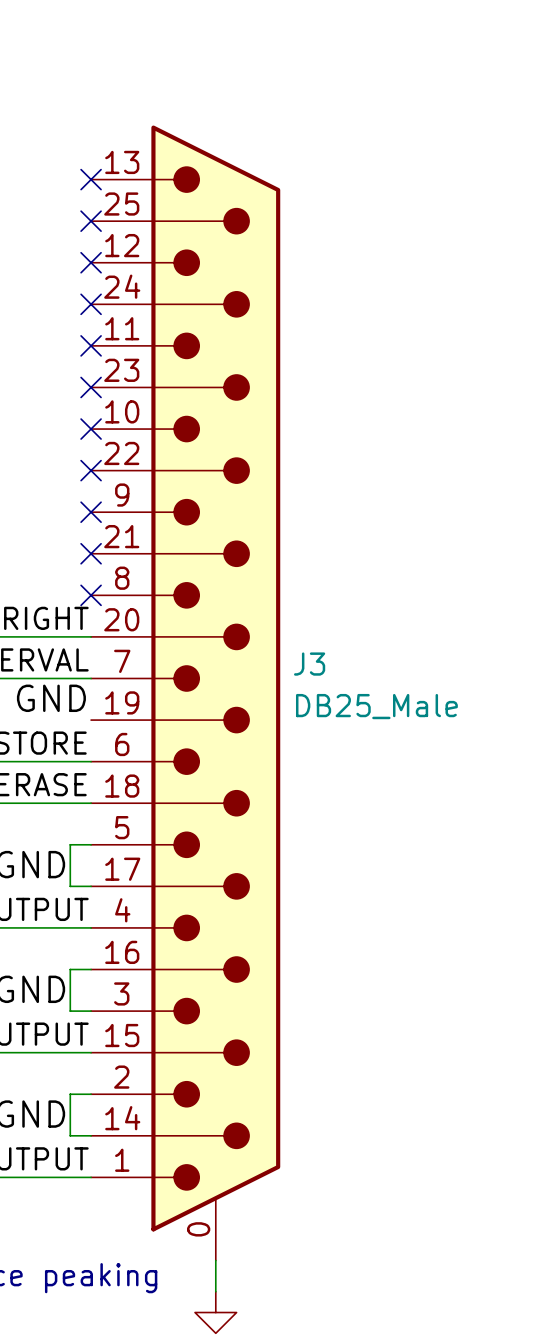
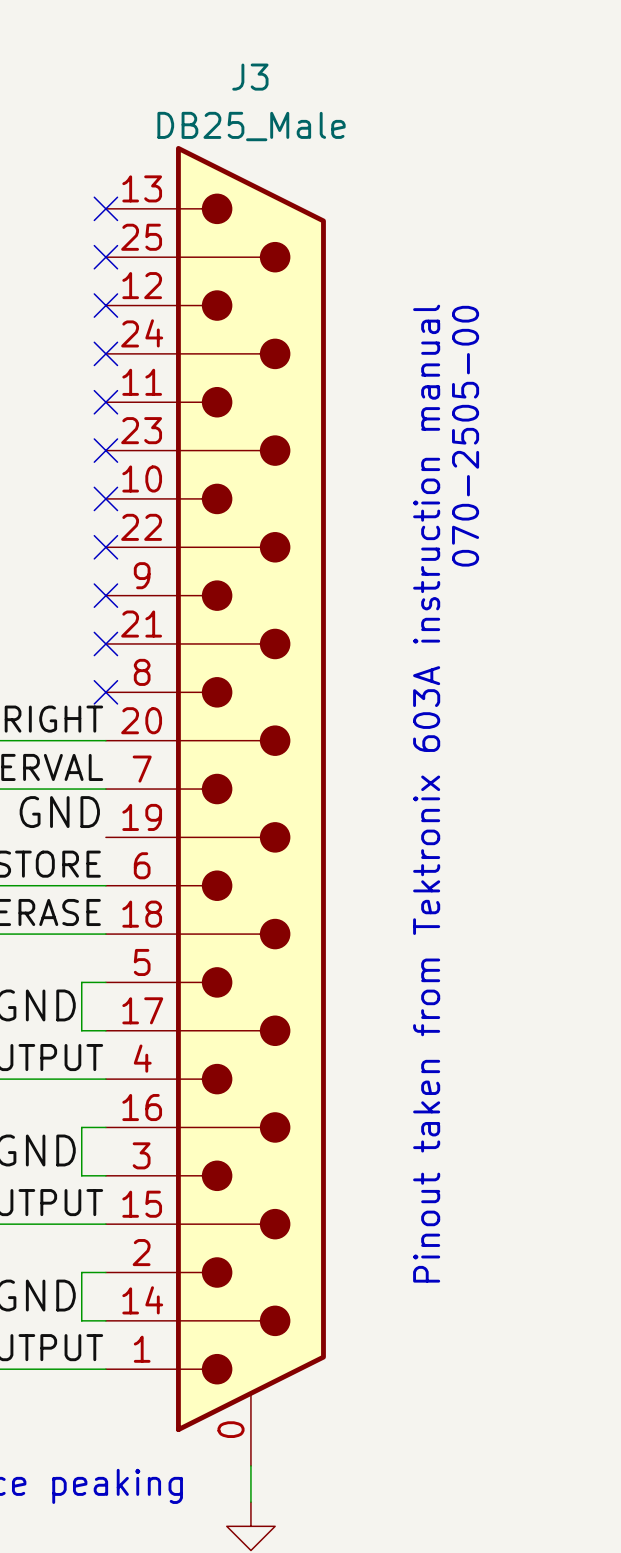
text: none -> 070-2505-00 (465, 436)
J3 name position: J3 (309, 664) -> J3 (250, 77)
text: none -> Pinout taken from Tektronix 603A instruction manual (426, 793)
J3 value position: DB25_Male (376, 706) -> DB25_Male (251, 126)

